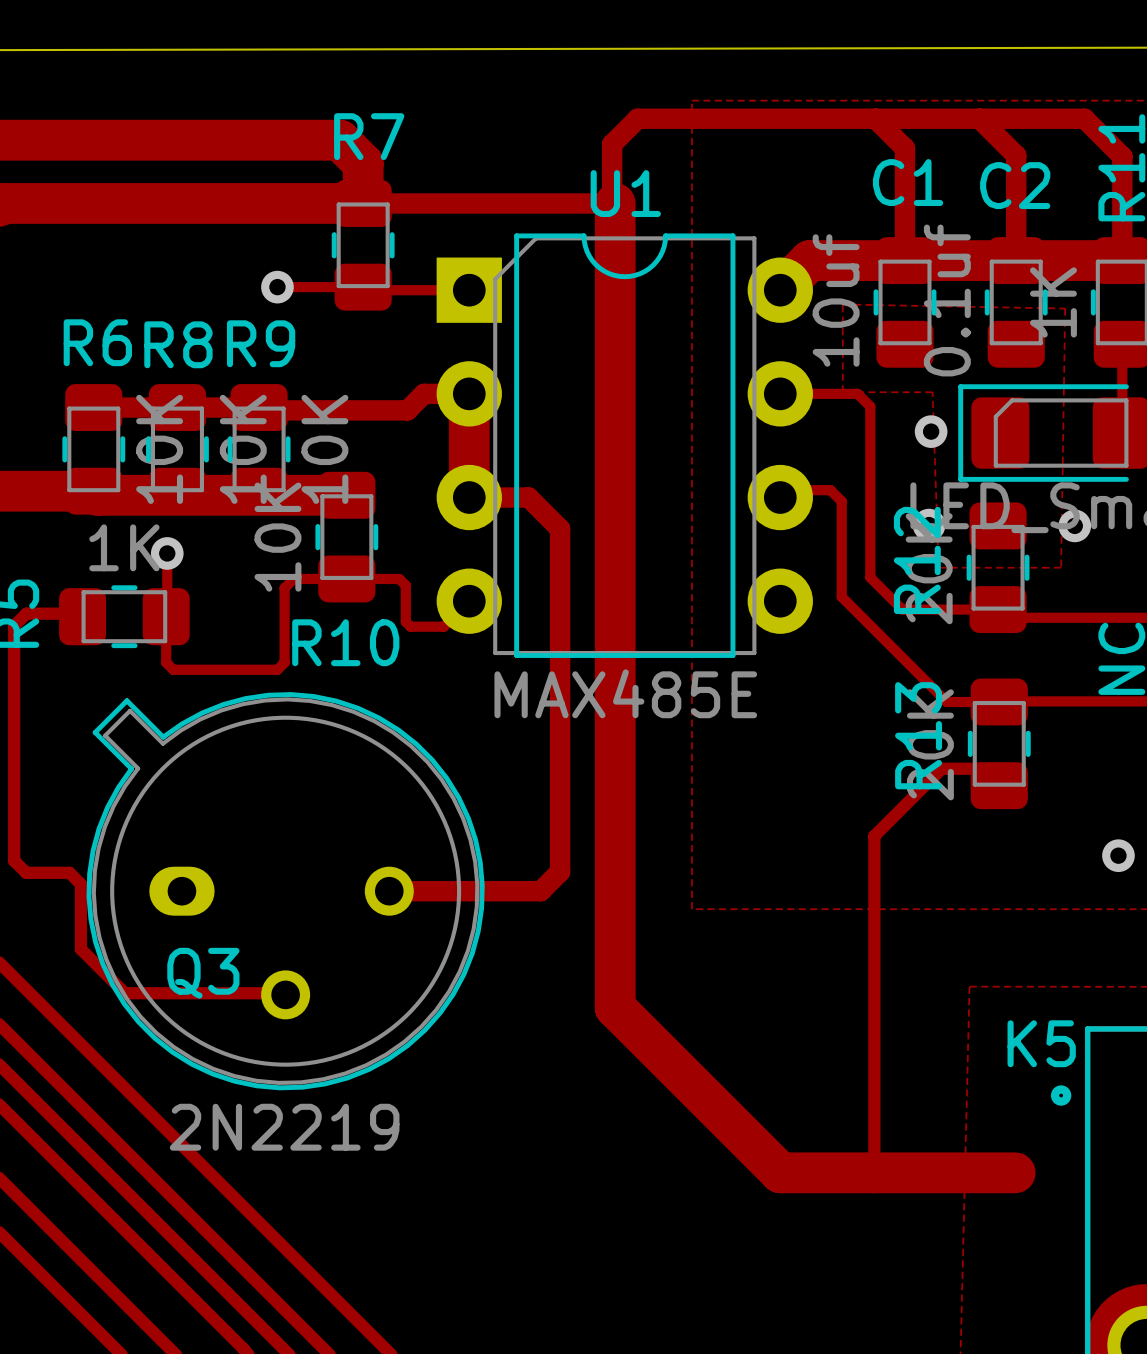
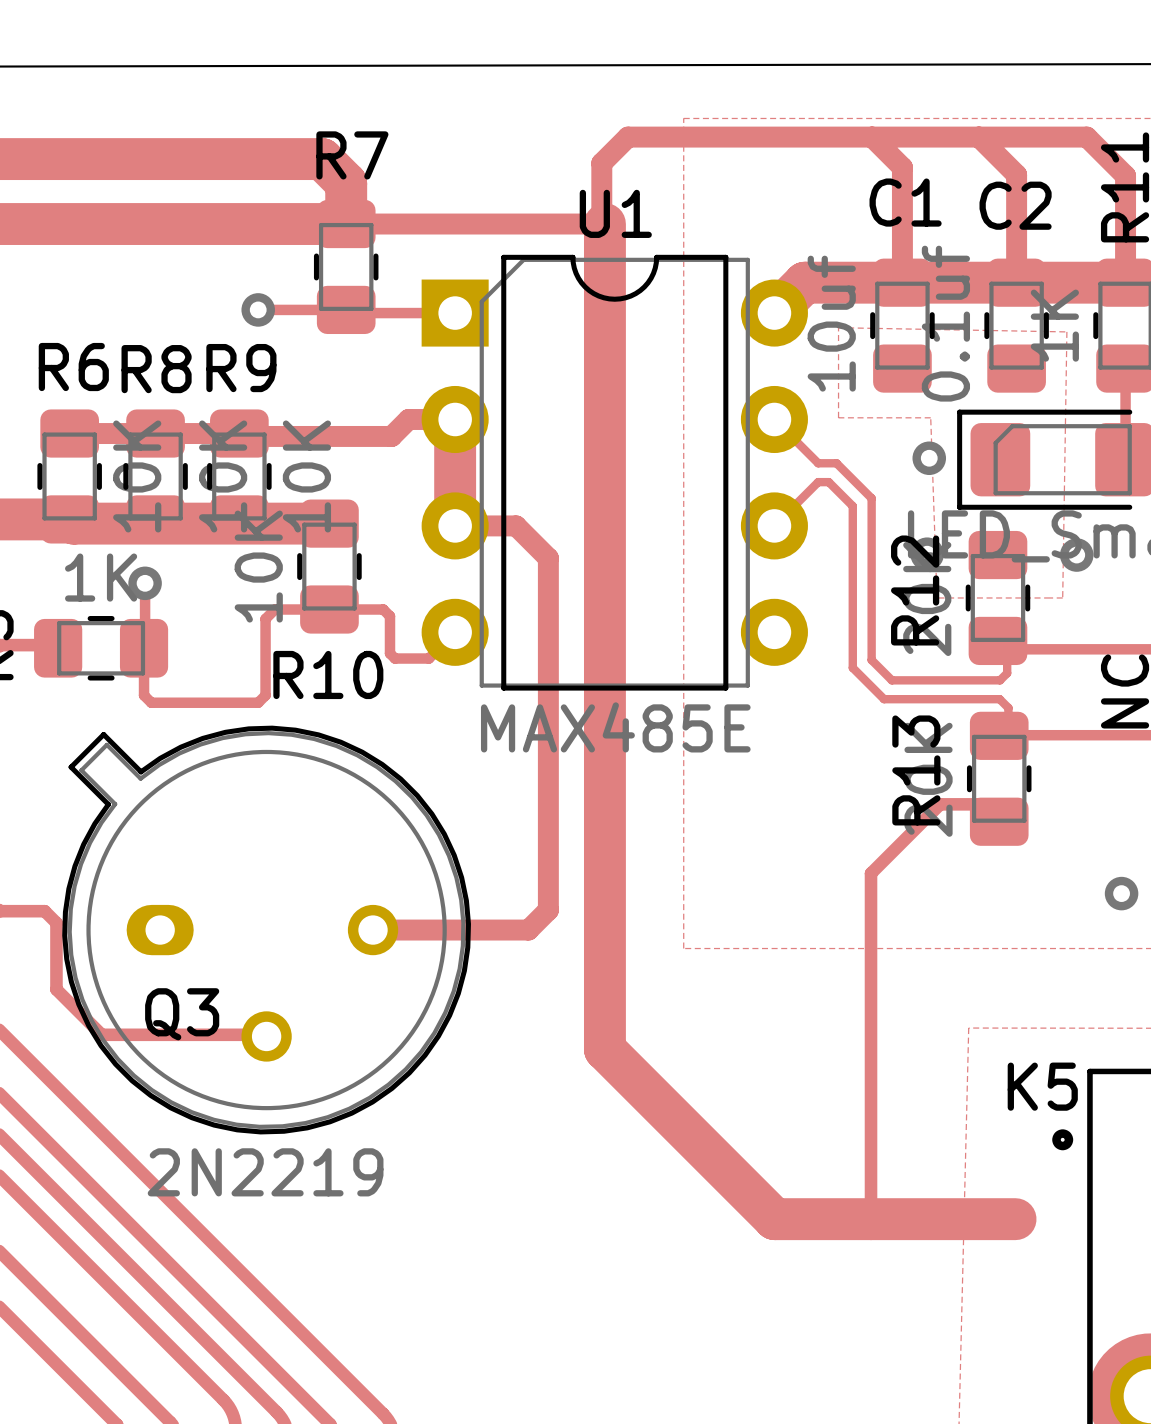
track: (780, 393) (857, 393) (870, 406) (870, 577) (902, 609) (998, 609) -> (774, 419) (818, 463) (836, 463) (871, 498) (871, 660) (891, 680) (1000, 680) (1007, 673) (1007, 650) (997, 640)
track: (787, 490) (830, 490) (841, 501) (841, 596) (946, 702) (999, 702) -> (774, 525) (818, 482) (828, 482) (852, 506) (852, 667) (884, 699) (999, 699) (1008, 707) (1008, 726) (999, 735)

